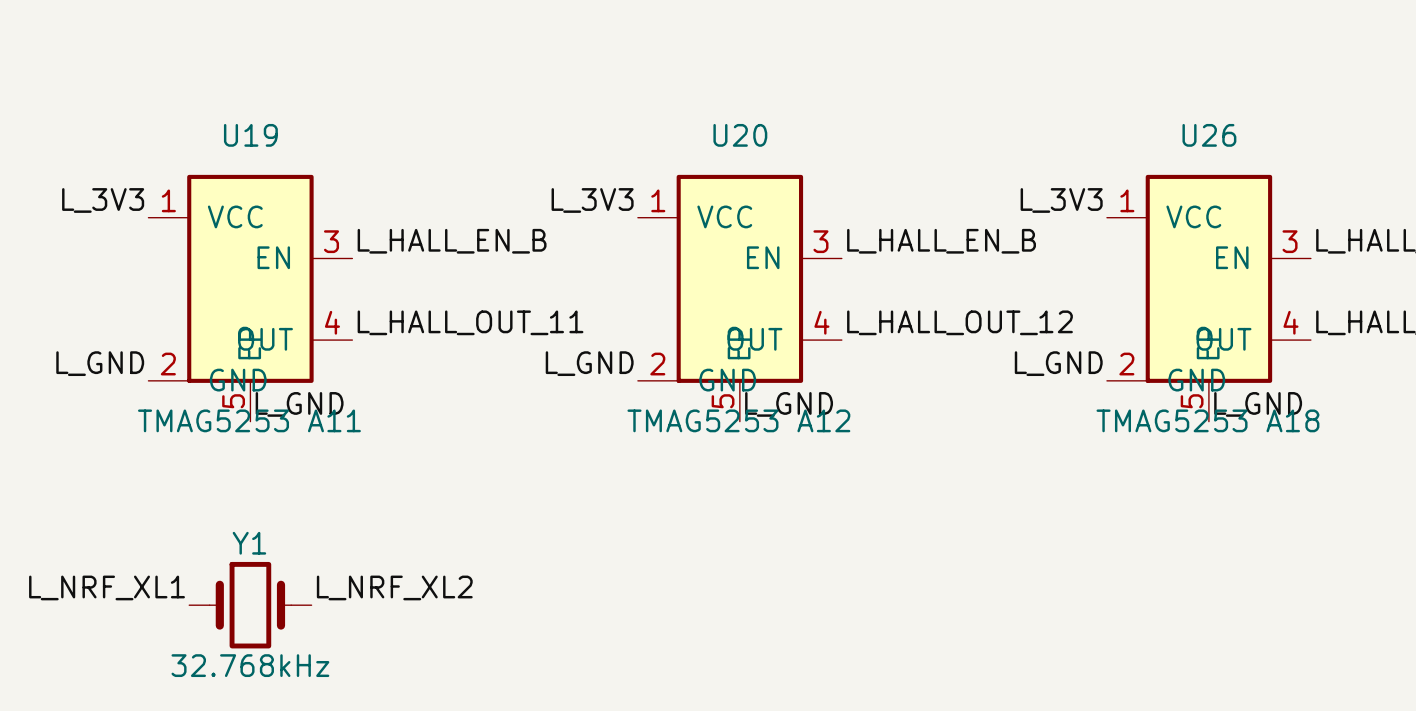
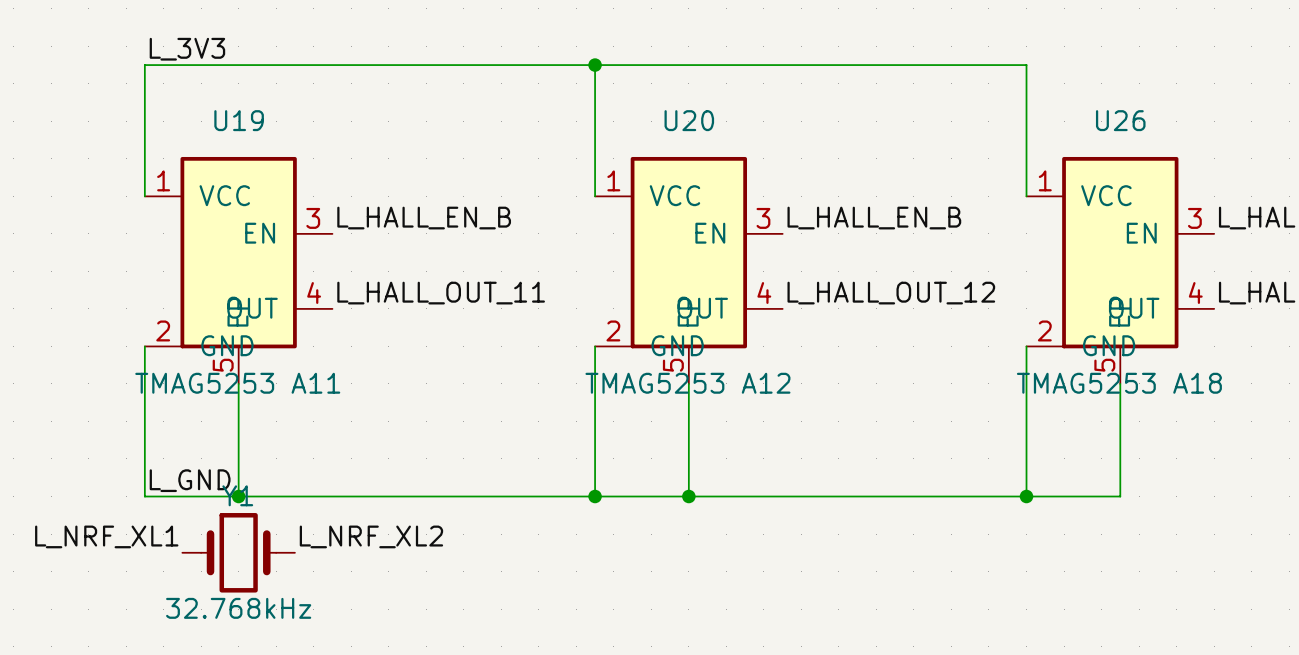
wire: none -> (595, 65) (595, 196)
junction: none -> (595, 65)
label position: L_3V3 (103, 200) -> L_3V3 (187, 49)
label: L_3V3 (592, 200) -> none
label: L_3V3 (1061, 200) -> none
wire: none -> (144, 196) (144, 65) (1026, 65) (1026, 196)
label: L_GND (100, 363) -> none
label: L_GND (589, 363) -> none
label: L_GND (1058, 363) -> none
wire: none -> (144, 346) (144, 496) (1120, 496) (1120, 383)
wire: none -> (595, 346) (595, 496)
wire: none -> (1026, 346) (1026, 496)
label: L_GND (299, 404) -> none
label: L_GND (789, 404) -> none
label: L_GND (1258, 404) -> none
wire: none -> (238, 383) (238, 496)
wire: none -> (688, 383) (688, 496)
label: none -> L_GND (190, 480)
junction: none -> (238, 496)
junction: none -> (595, 496)
junction: none -> (688, 496)
junction: none -> (1026, 496)

